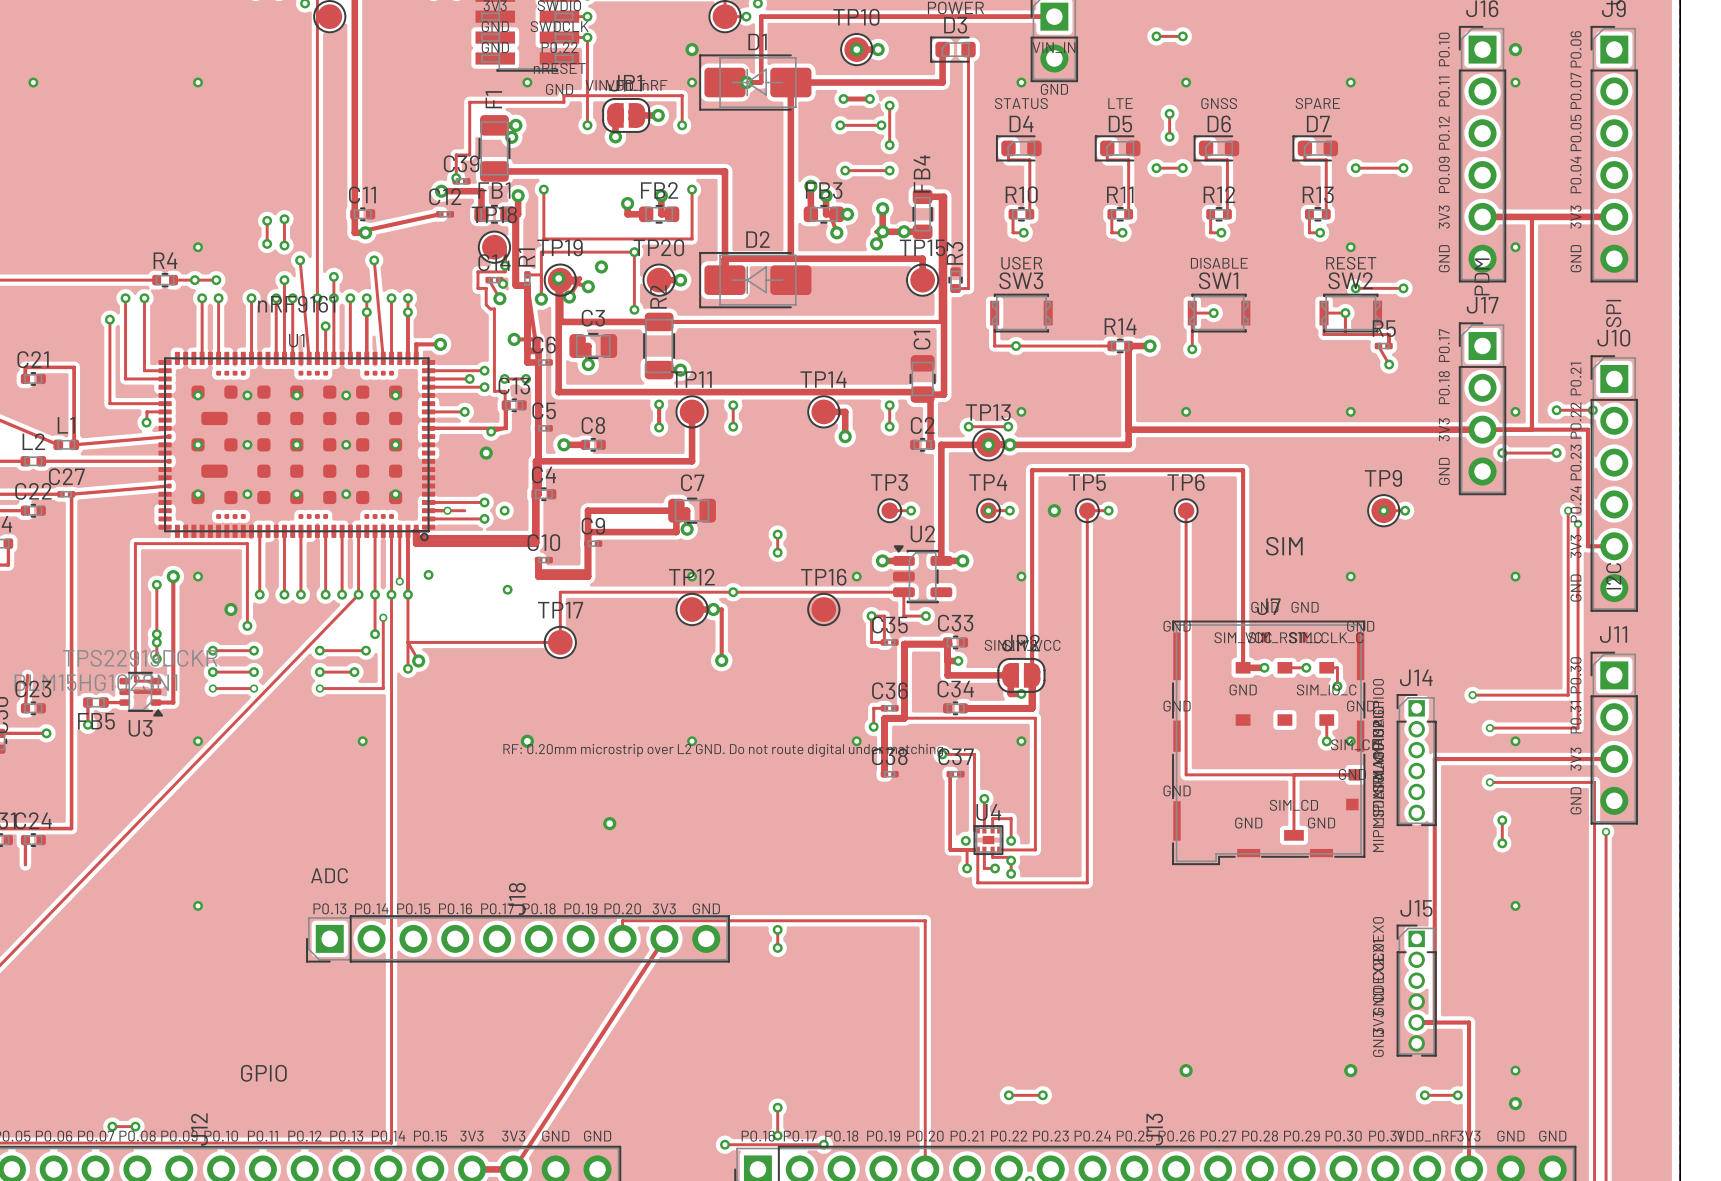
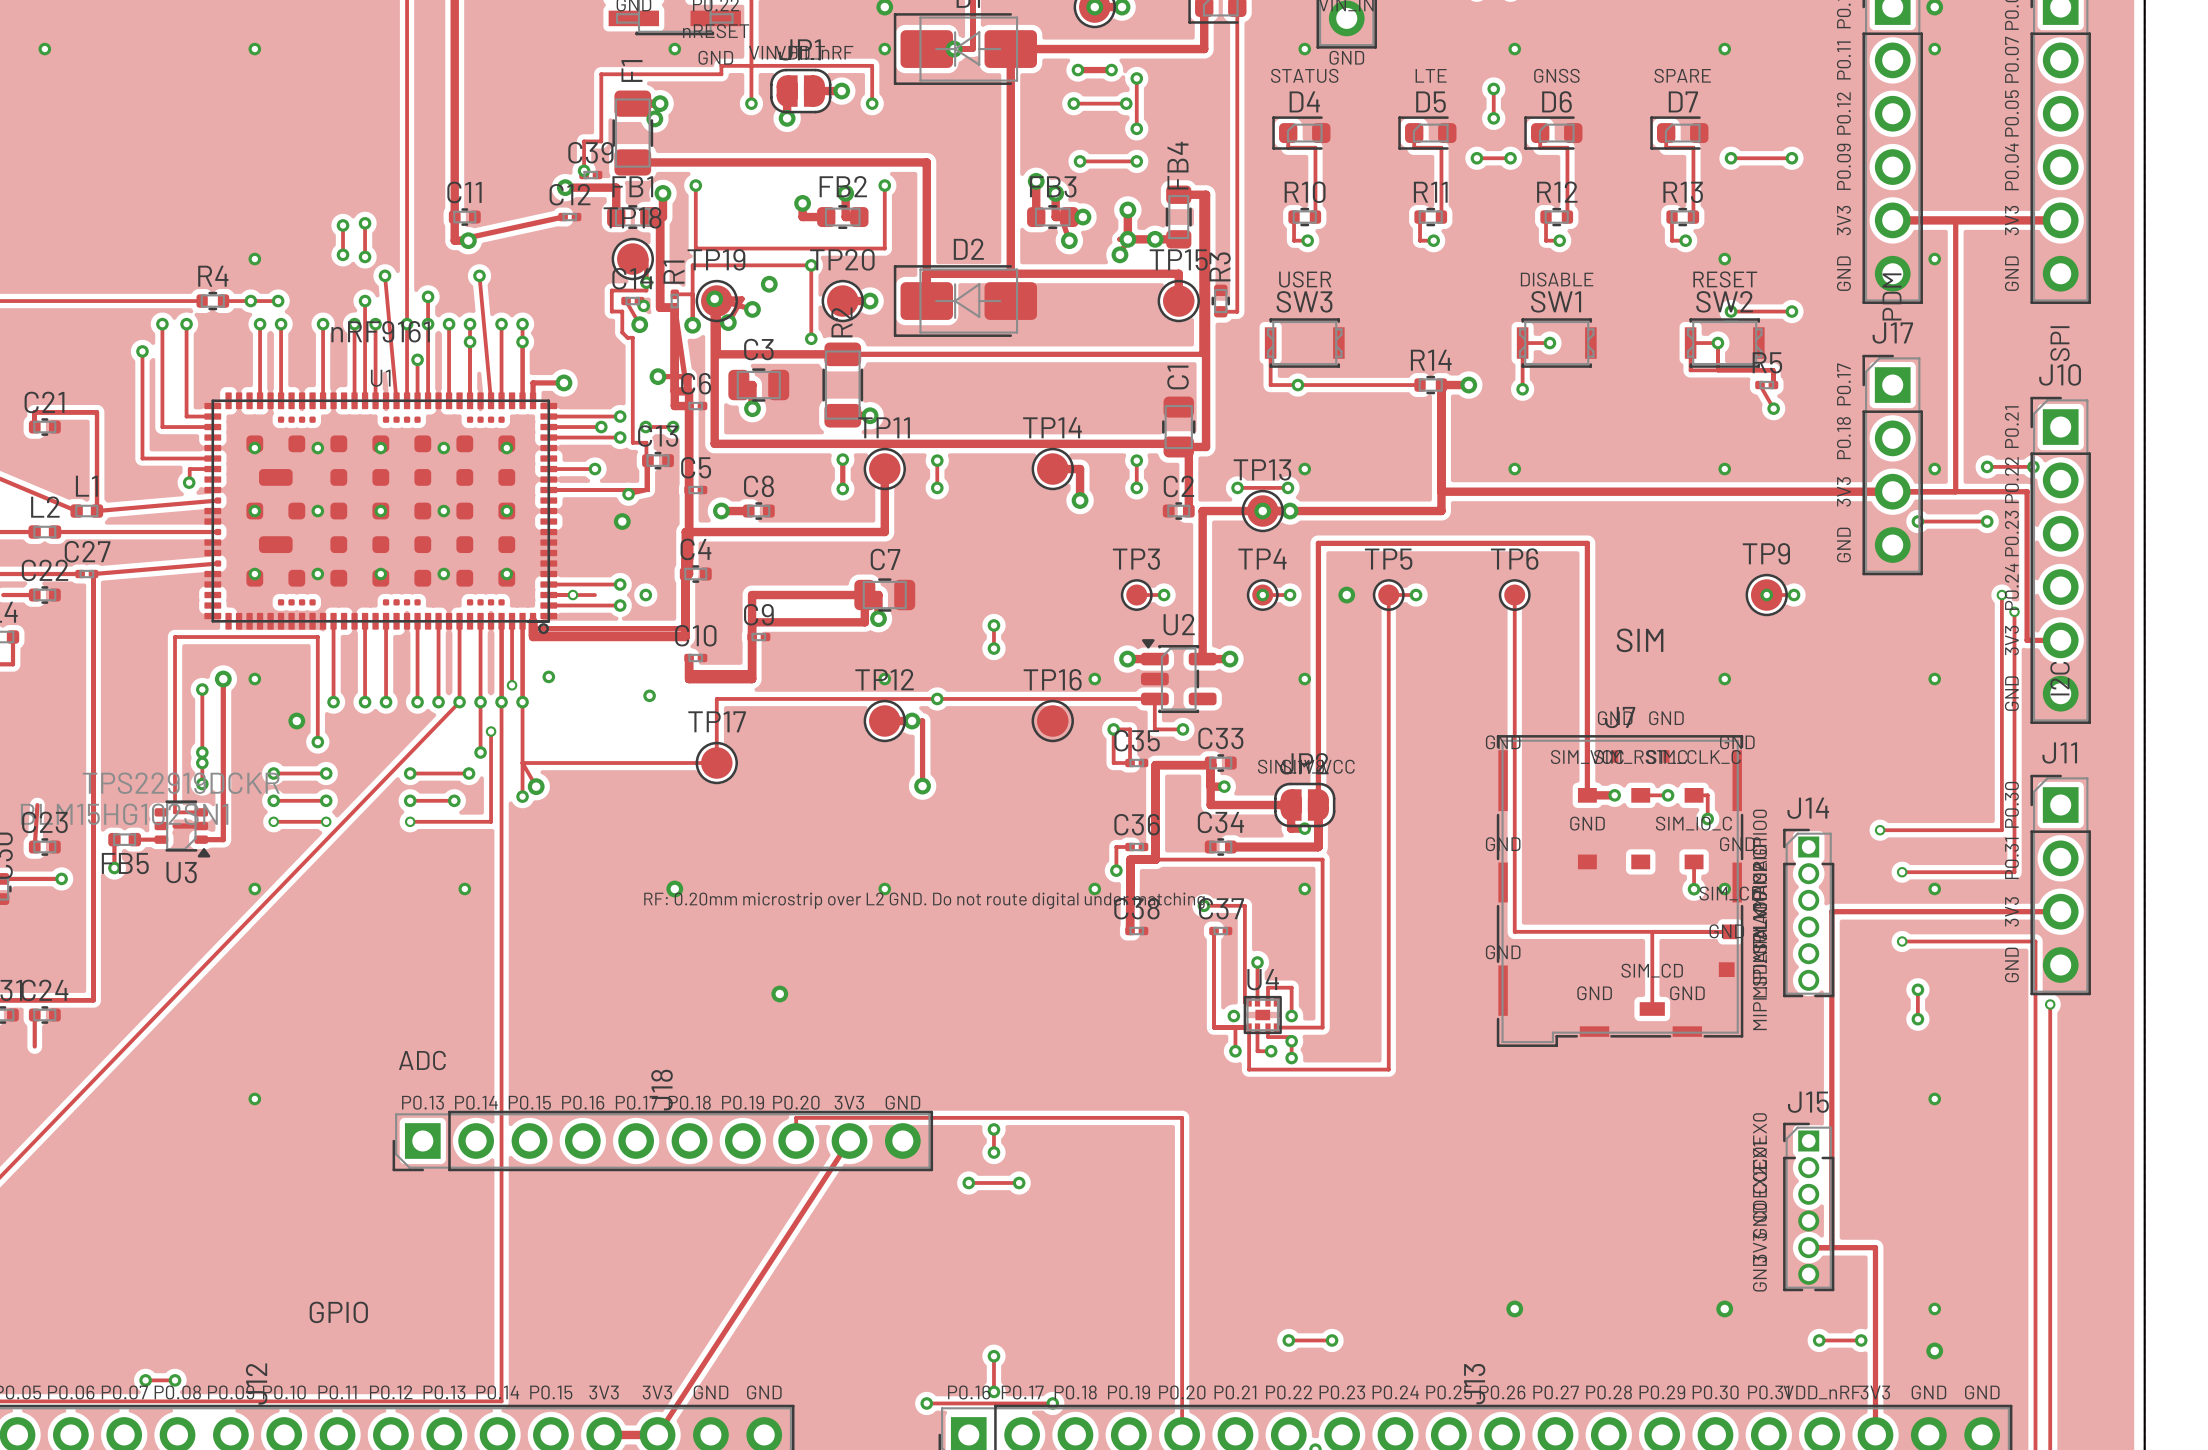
track: none -> (968, 1182) (1019, 1182)
via: none -> (968, 1182)
via: none -> (1019, 1182)

